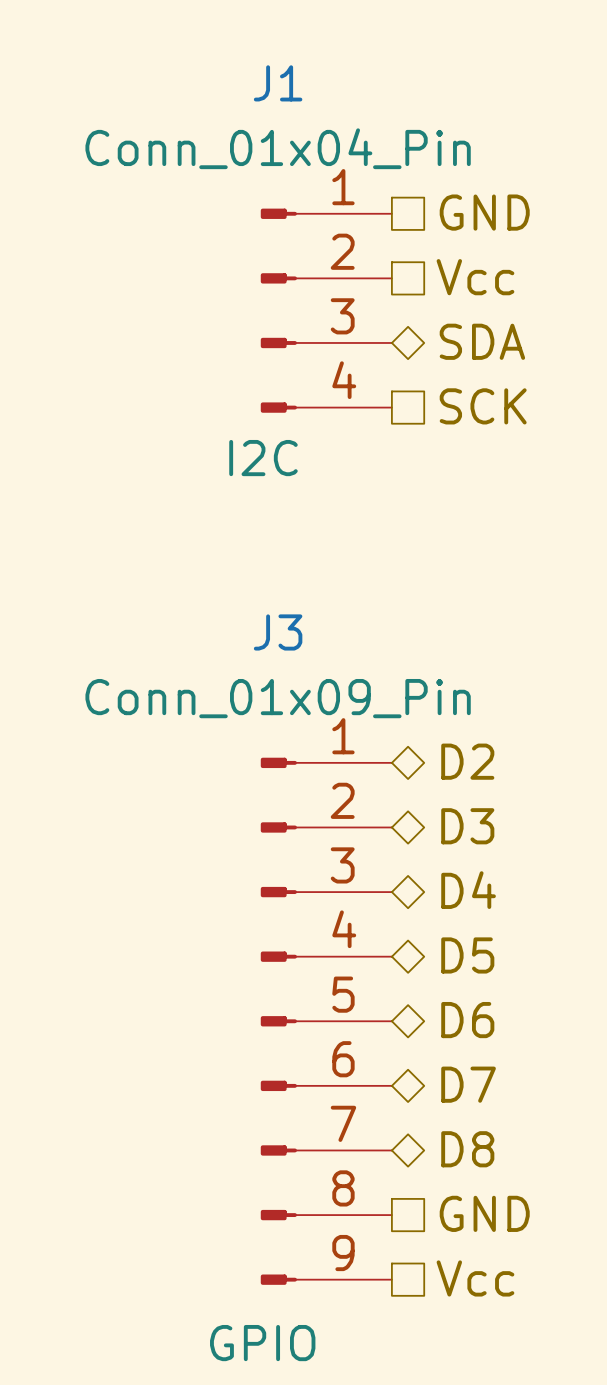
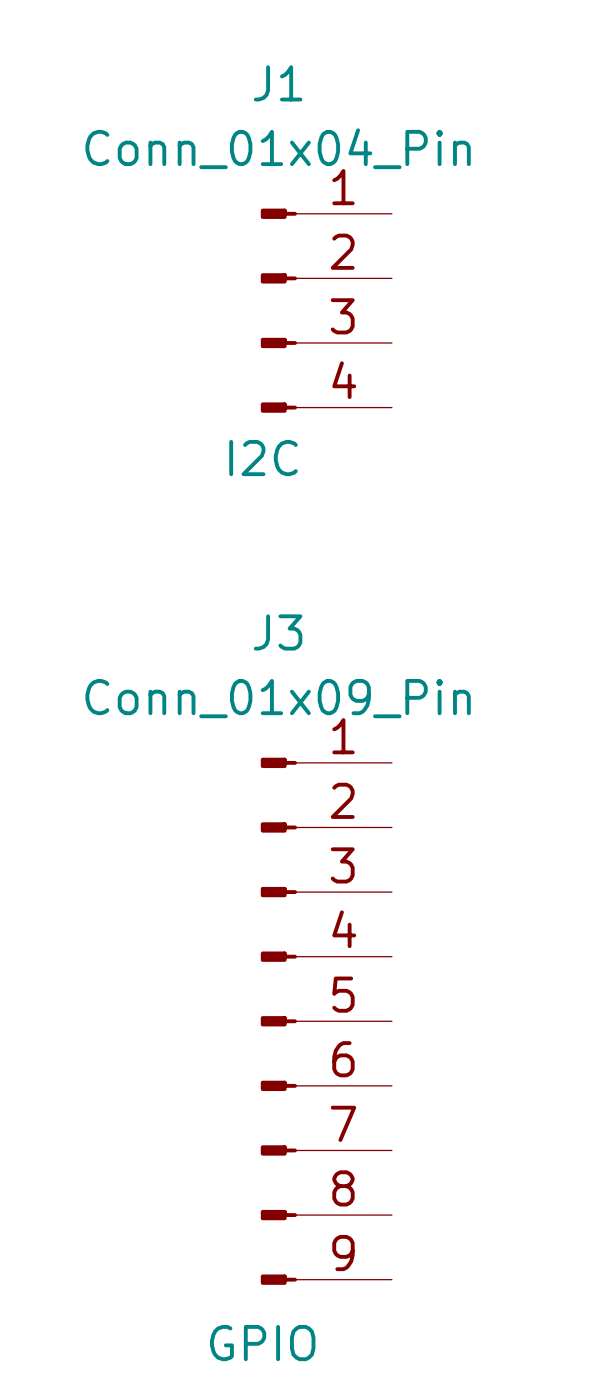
hierarchical label: GND (484, 212) -> none
hierarchical label: Vcc (475, 277) -> none
hierarchical label: SDA (482, 341) -> none
hierarchical label: SCK (483, 406) -> none
hierarchical label: D2 (467, 761) -> none
hierarchical label: D3 (467, 826) -> none
hierarchical label: D4 (468, 890) -> none
hierarchical label: D5 (467, 955) -> none
hierarchical label: D6 (467, 1020) -> none
hierarchical label: D7 (468, 1084) -> none
hierarchical label: D8 (467, 1149) -> none
hierarchical label: GND (484, 1213) -> none
hierarchical label: Vcc (475, 1278) -> none

